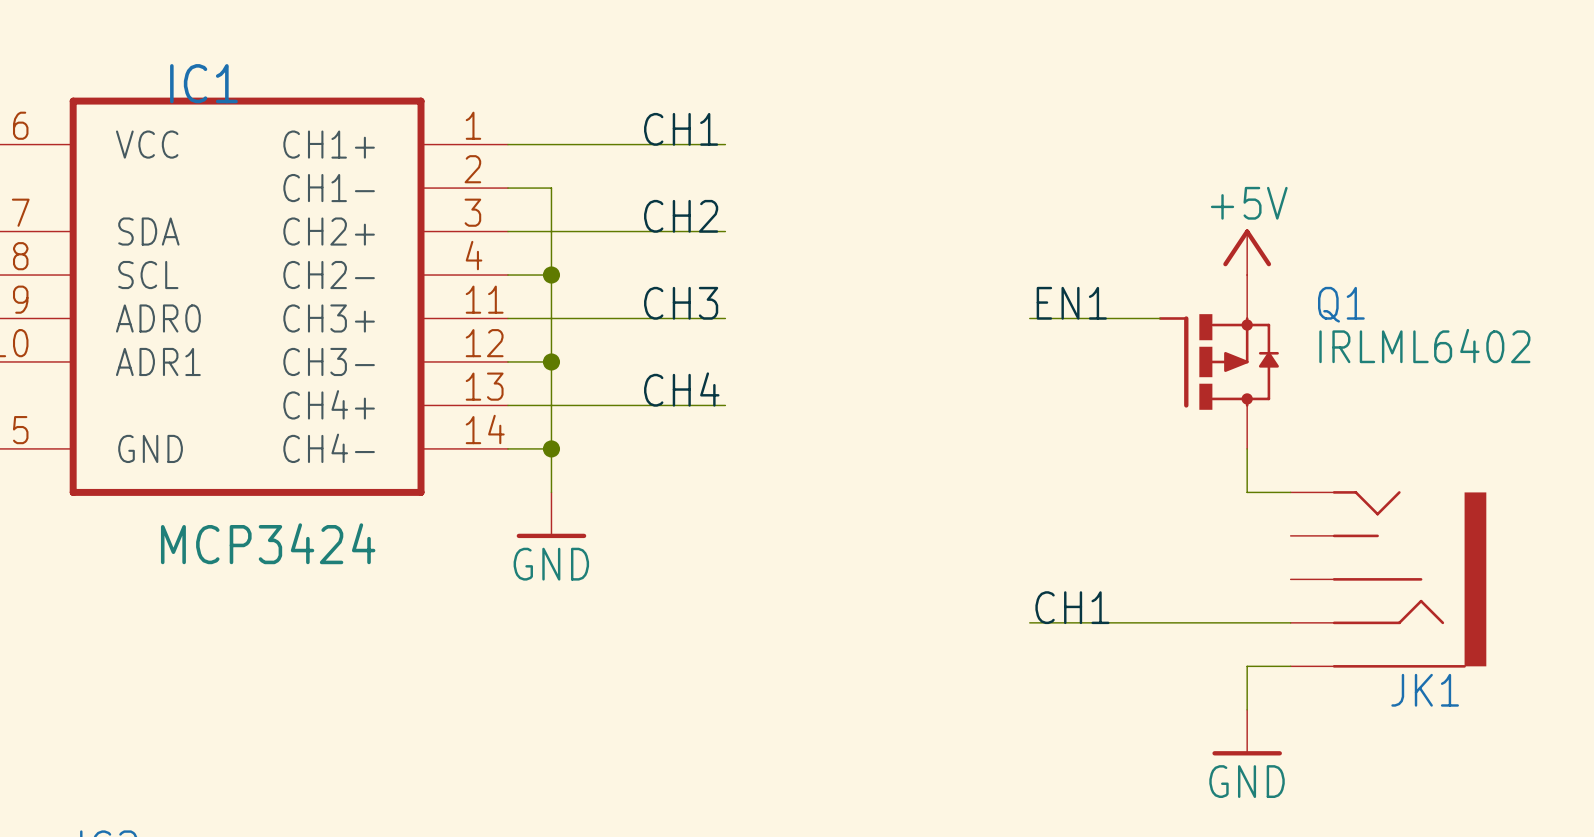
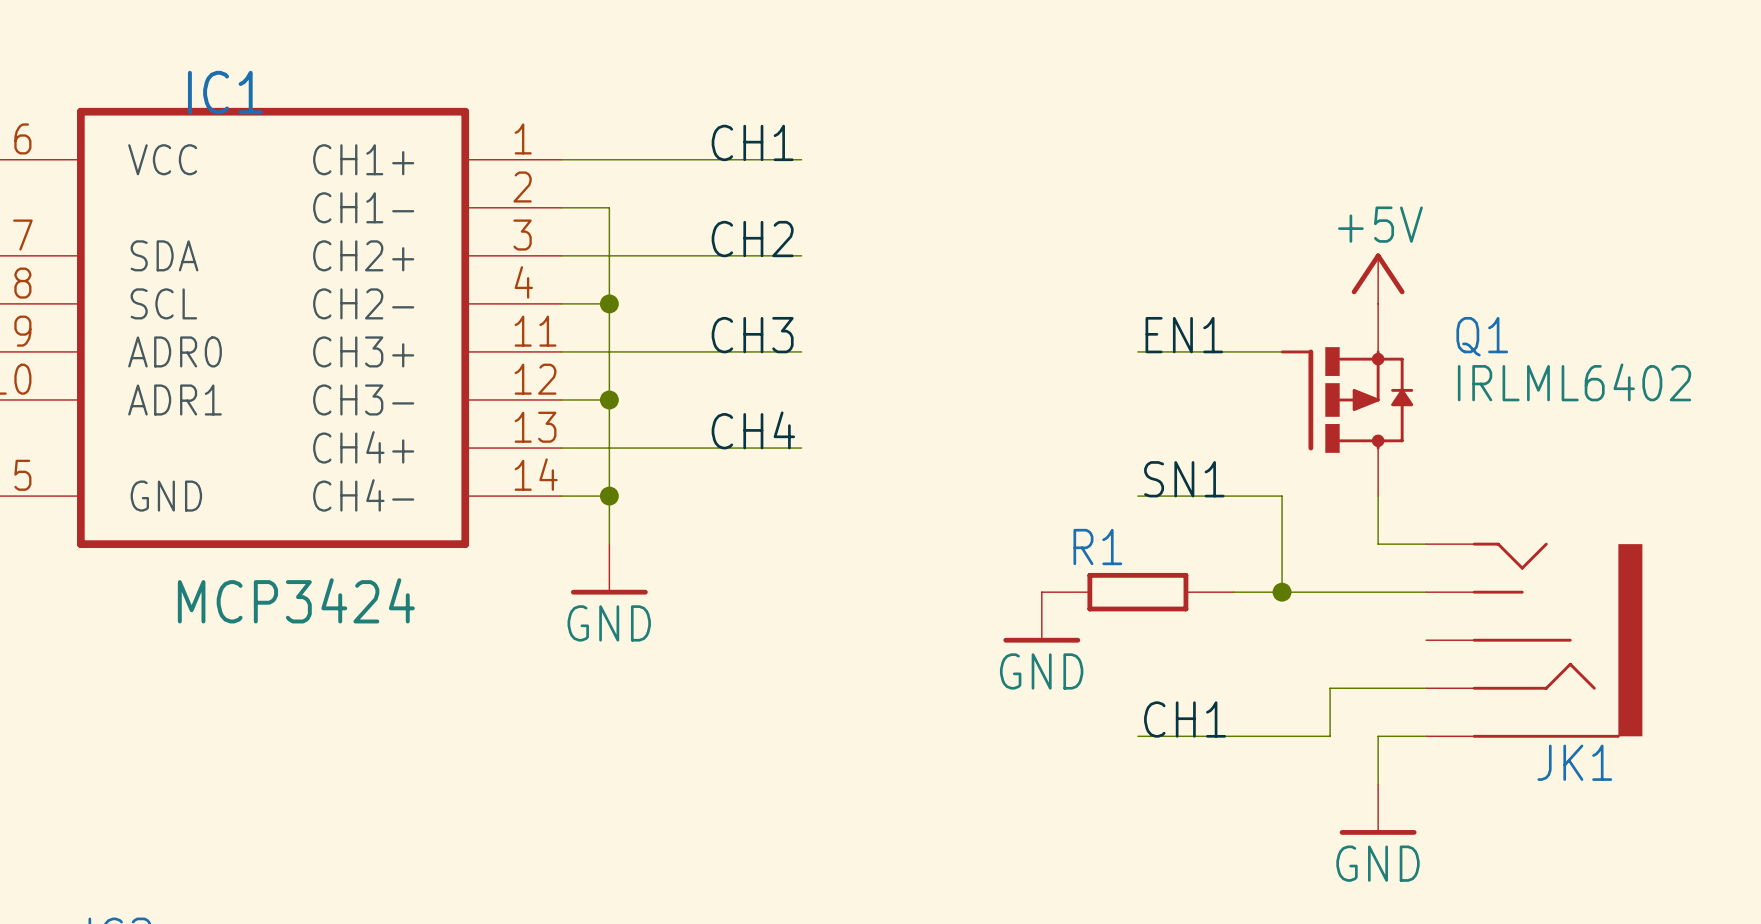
label: none -> SN1 (1184, 479)
wire: none -> (1137, 496) (1282, 496) (1282, 592)
R1: none -> (1137, 592)
wire: none -> (1233, 592) (1426, 592)
junction: none -> (1282, 592)
power symbol: none -> GND (1041, 617)
label position: CH1 (1072, 607) -> CH1 (1185, 719)
wire: (1029, 622) (1203, 622) -> (1137, 736) (1330, 736) (1330, 688)

